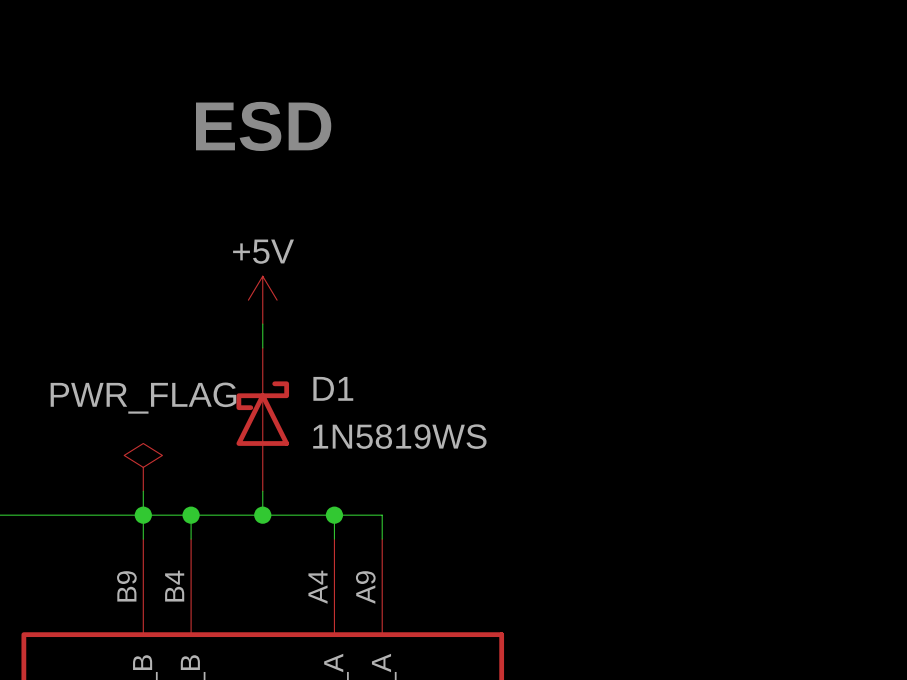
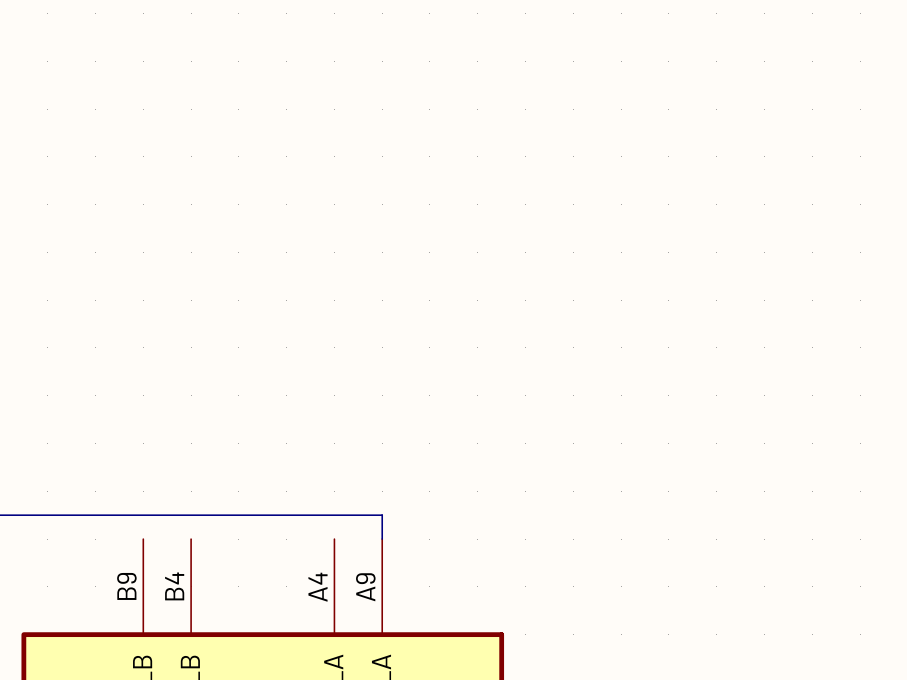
text: ESD (263, 126) -> none
power symbol: +5V (262, 300) -> none
wire: (262, 324) (262, 347) -> none
D1: 1N5819WS (262, 419) -> none
power symbol: PWR_FLAG (143, 467) -> none
wire: (143, 491) (143, 539) -> none
wire: (262, 491) (262, 515) -> none
junction: (143, 515) -> none
wire: (191, 515) (191, 539) -> none
junction: (191, 515) -> none
junction: (262, 515) -> none
wire: (334, 515) (334, 539) -> none
junction: (334, 515) -> none

